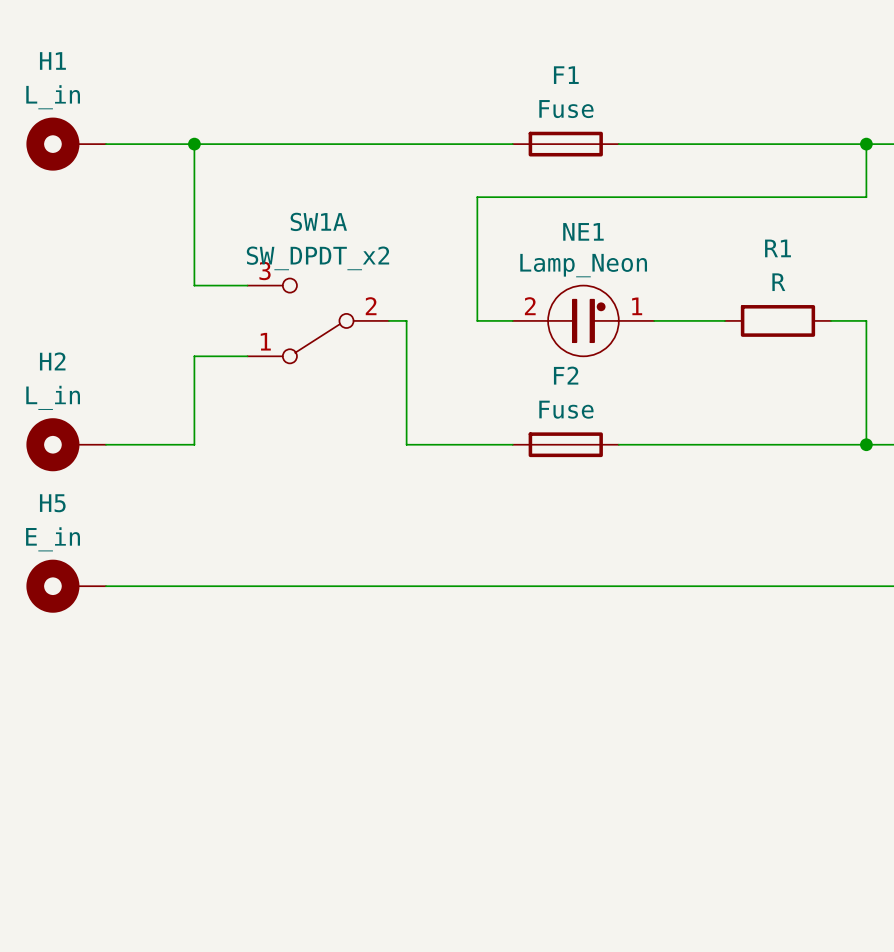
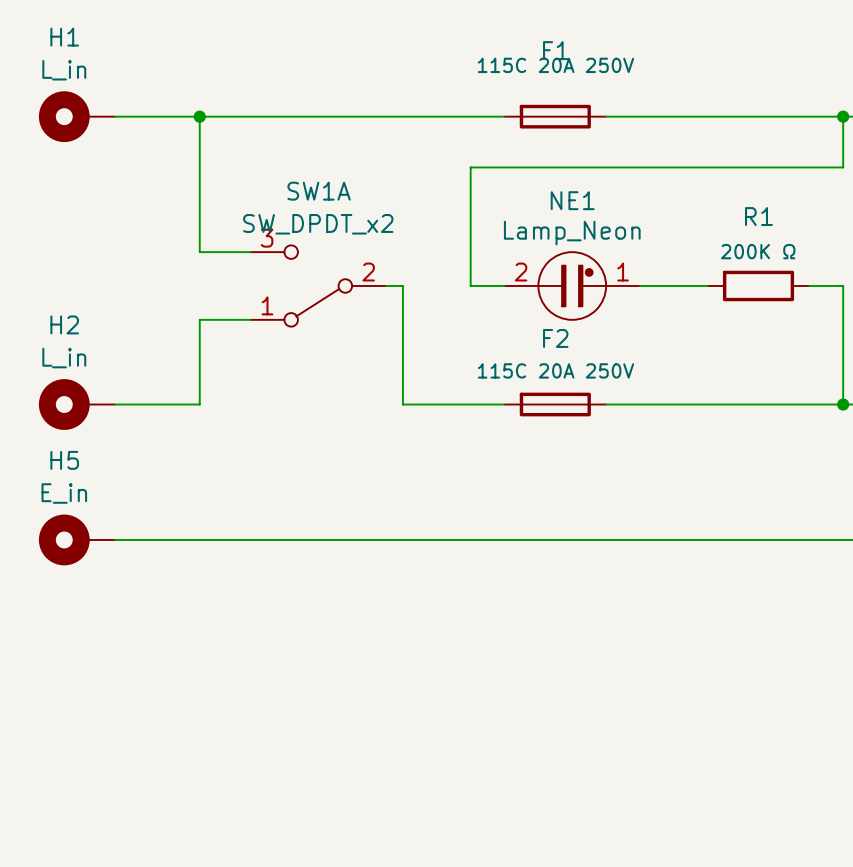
F1 value: Fuse (566, 109) -> 115C 20A 250V (555, 65)
R1 value: R (778, 282) -> 200K Ω (758, 251)
F2 value: Fuse (566, 409) -> 115C 20A 250V (555, 370)

